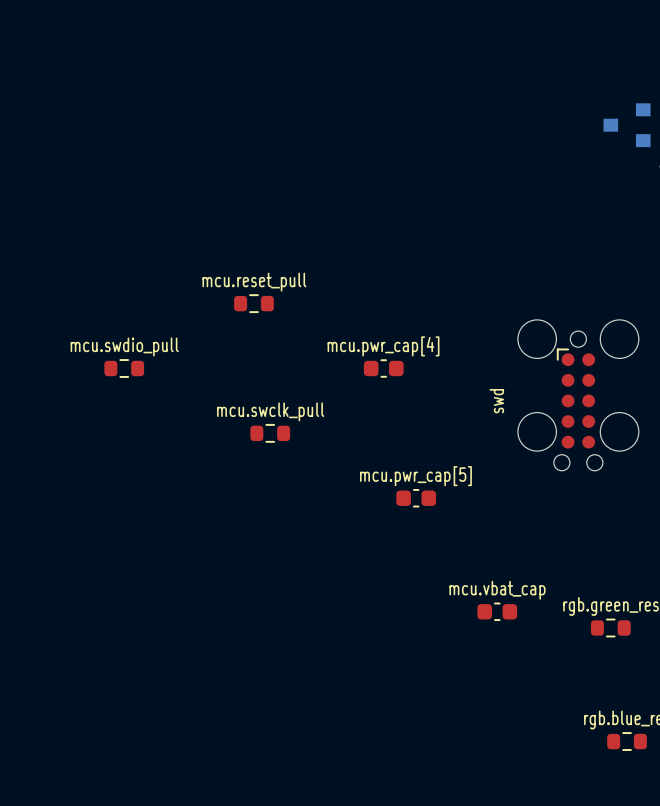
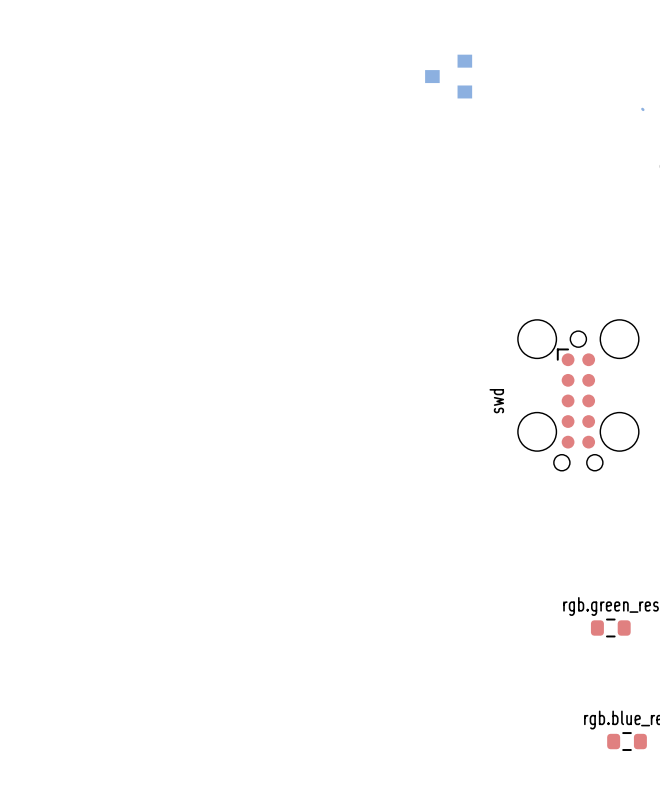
part position: (627, 125) -> (448, 76)
mcu.reset_pull: (253, 303) -> none
mcu.swdio_pull: (124, 368) -> none
mcu.pwr_cap[4]: (383, 368) -> none
mcu.swclk_pull: (270, 433) -> none
mcu.pwr_cap[5]: (416, 498) -> none
mcu.vbat_cap: (497, 611) -> none

